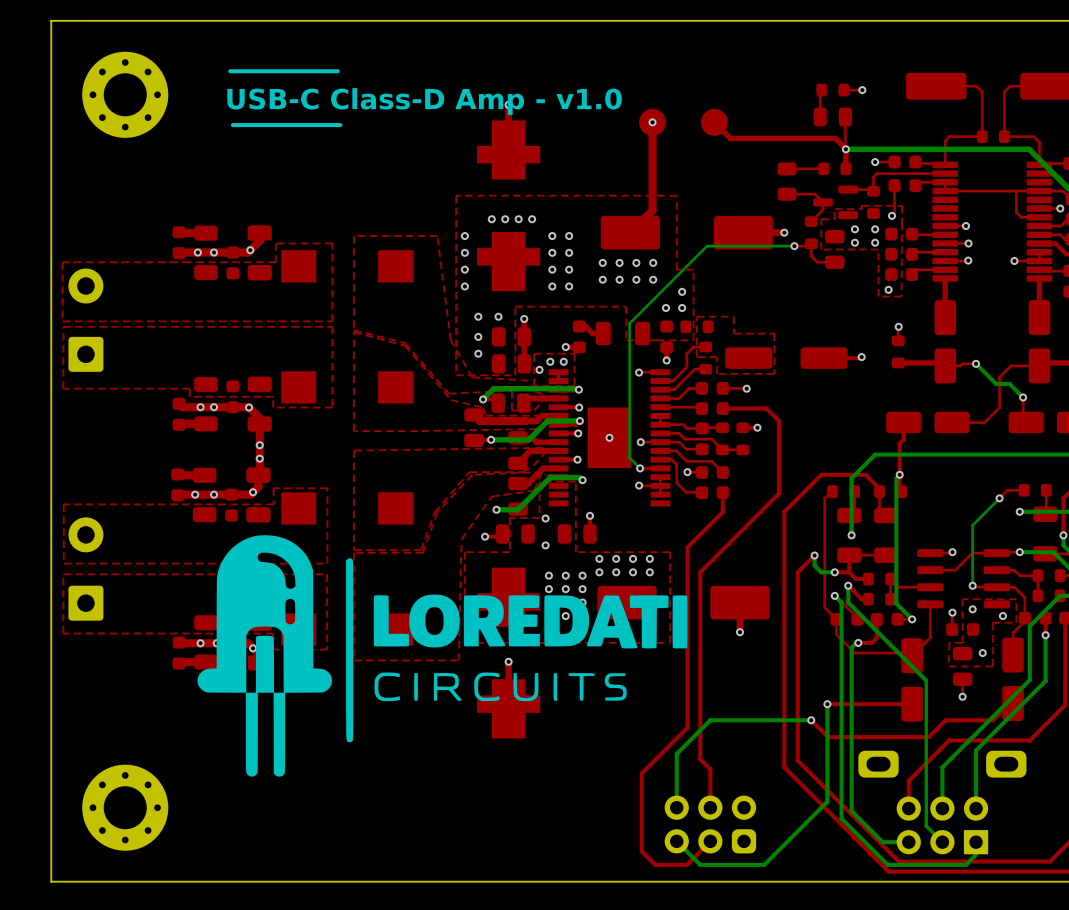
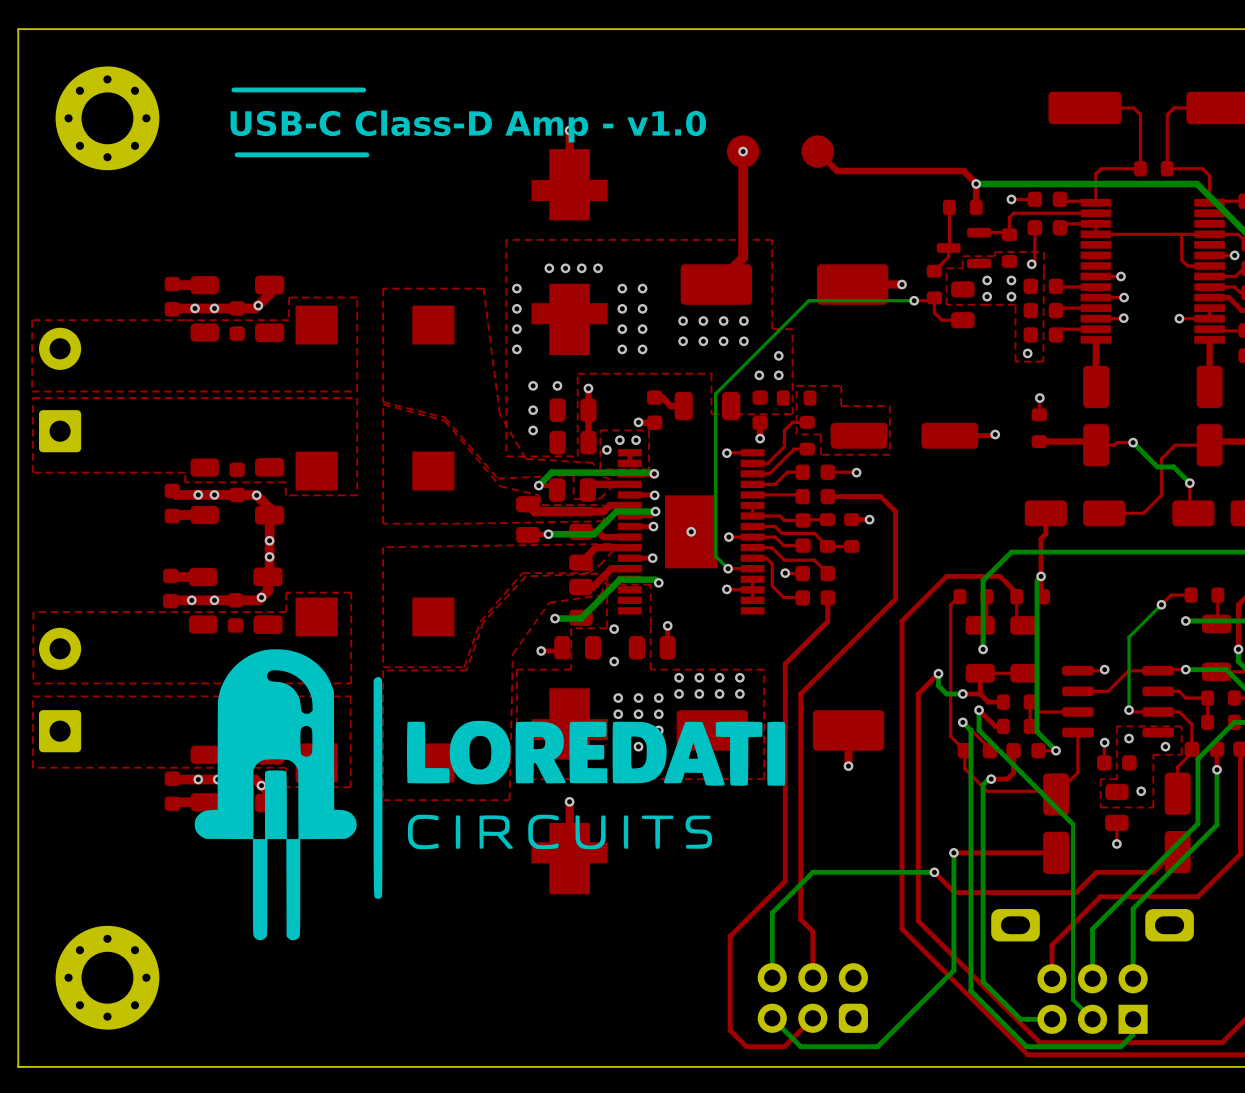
top track: (821, 90) (820, 116) -> none
part: (832, 90) -> none
top track: (862, 90) (843, 90) -> none
via: (862, 90) -> none
part: (832, 116) -> none
top track: (845, 116) (845, 149) -> none
top track: (823, 168) (787, 168) -> (949, 207) (949, 247)
part: (787, 181) -> none
top track: (792, 194) (814, 194) (823, 202) -> none

